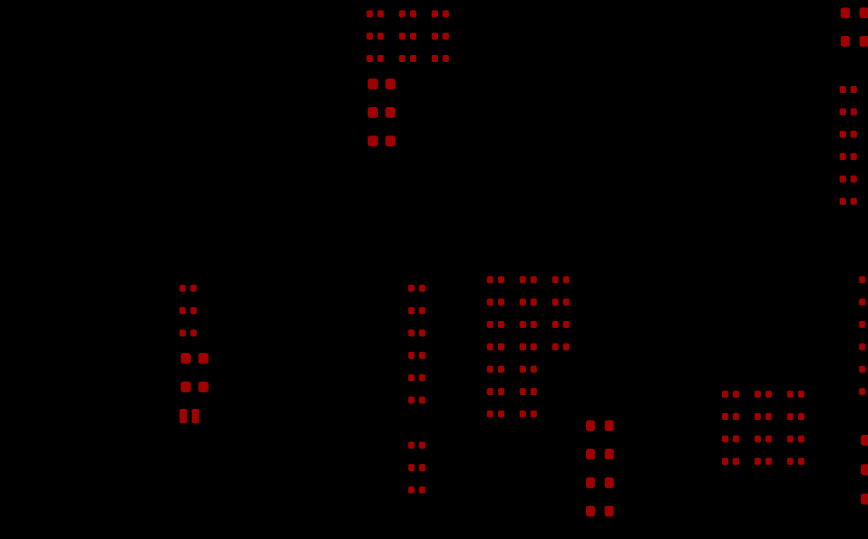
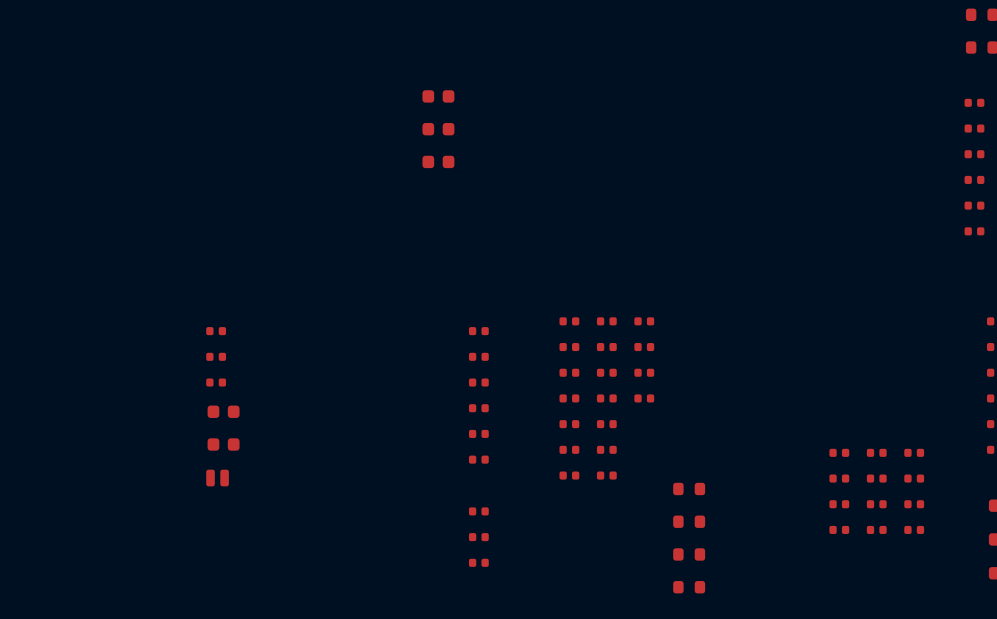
part: (375, 13) -> none
part: (407, 13) -> none
part: (440, 13) -> none
part: (375, 36) -> none
part: (407, 36) -> none
part: (440, 36) -> none
part: (375, 58) -> none
part: (407, 58) -> none
part: (440, 58) -> none

